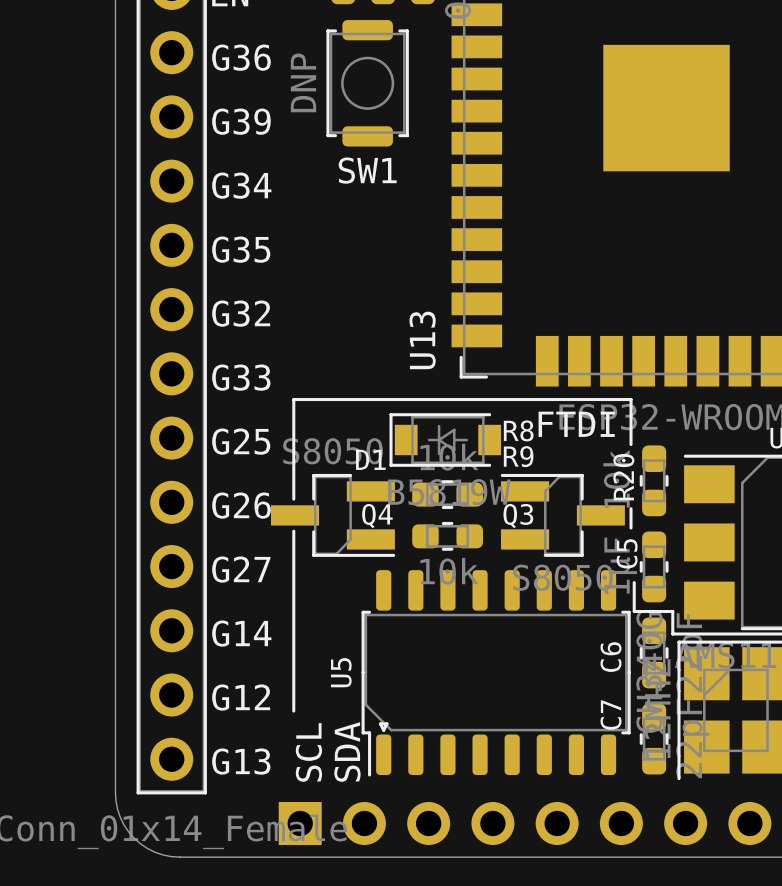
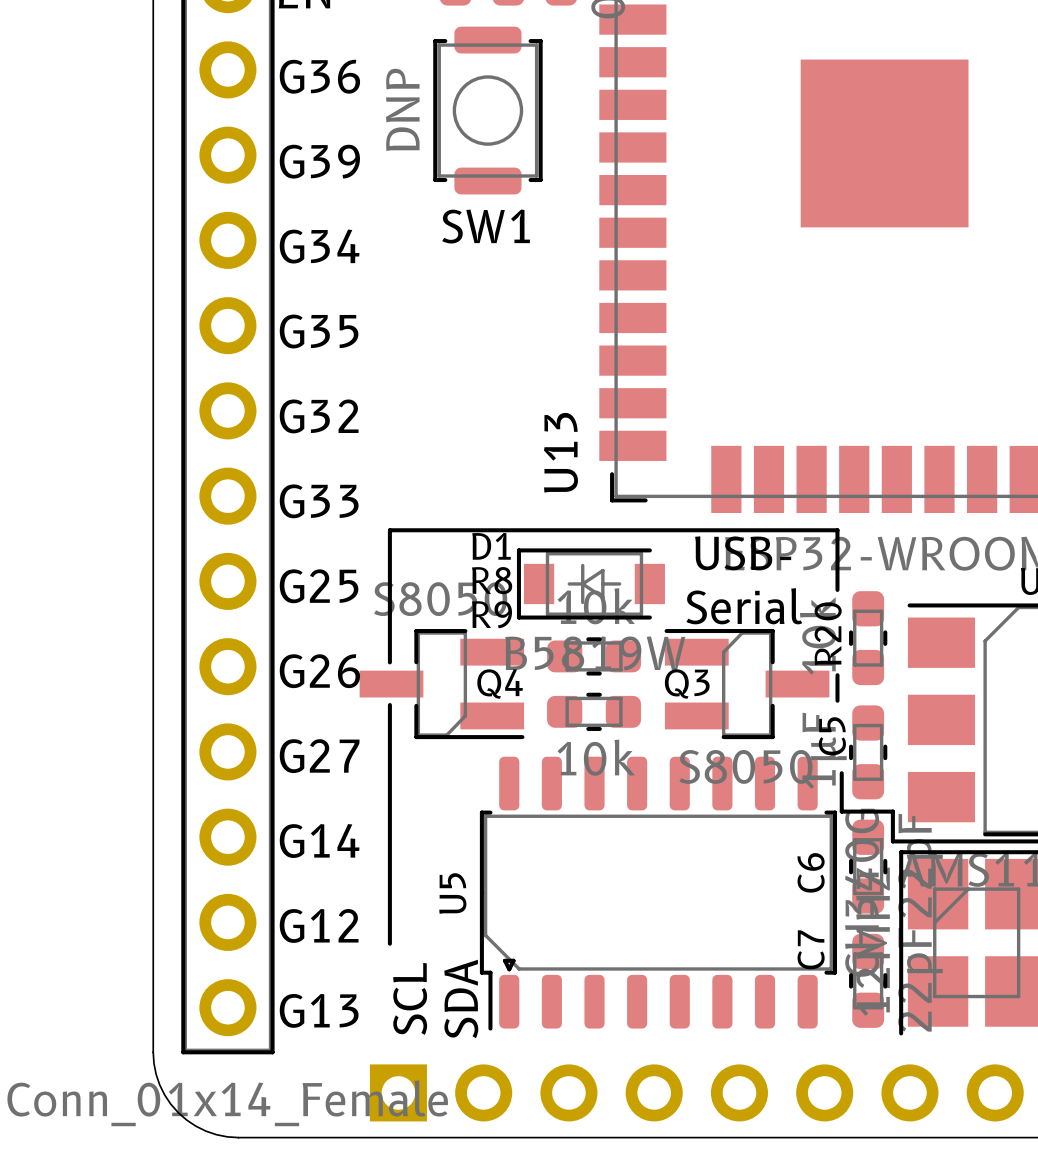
text: FTDI (576, 424) -> USB- (743, 553)
R8 name position: R8 (518, 430) -> R8 (492, 580)
R9 name position: R9 (518, 456) -> R9 (492, 614)
text: none -> Serial (744, 606)
D1 name position: D1 (370, 459) -> D1 (491, 546)

